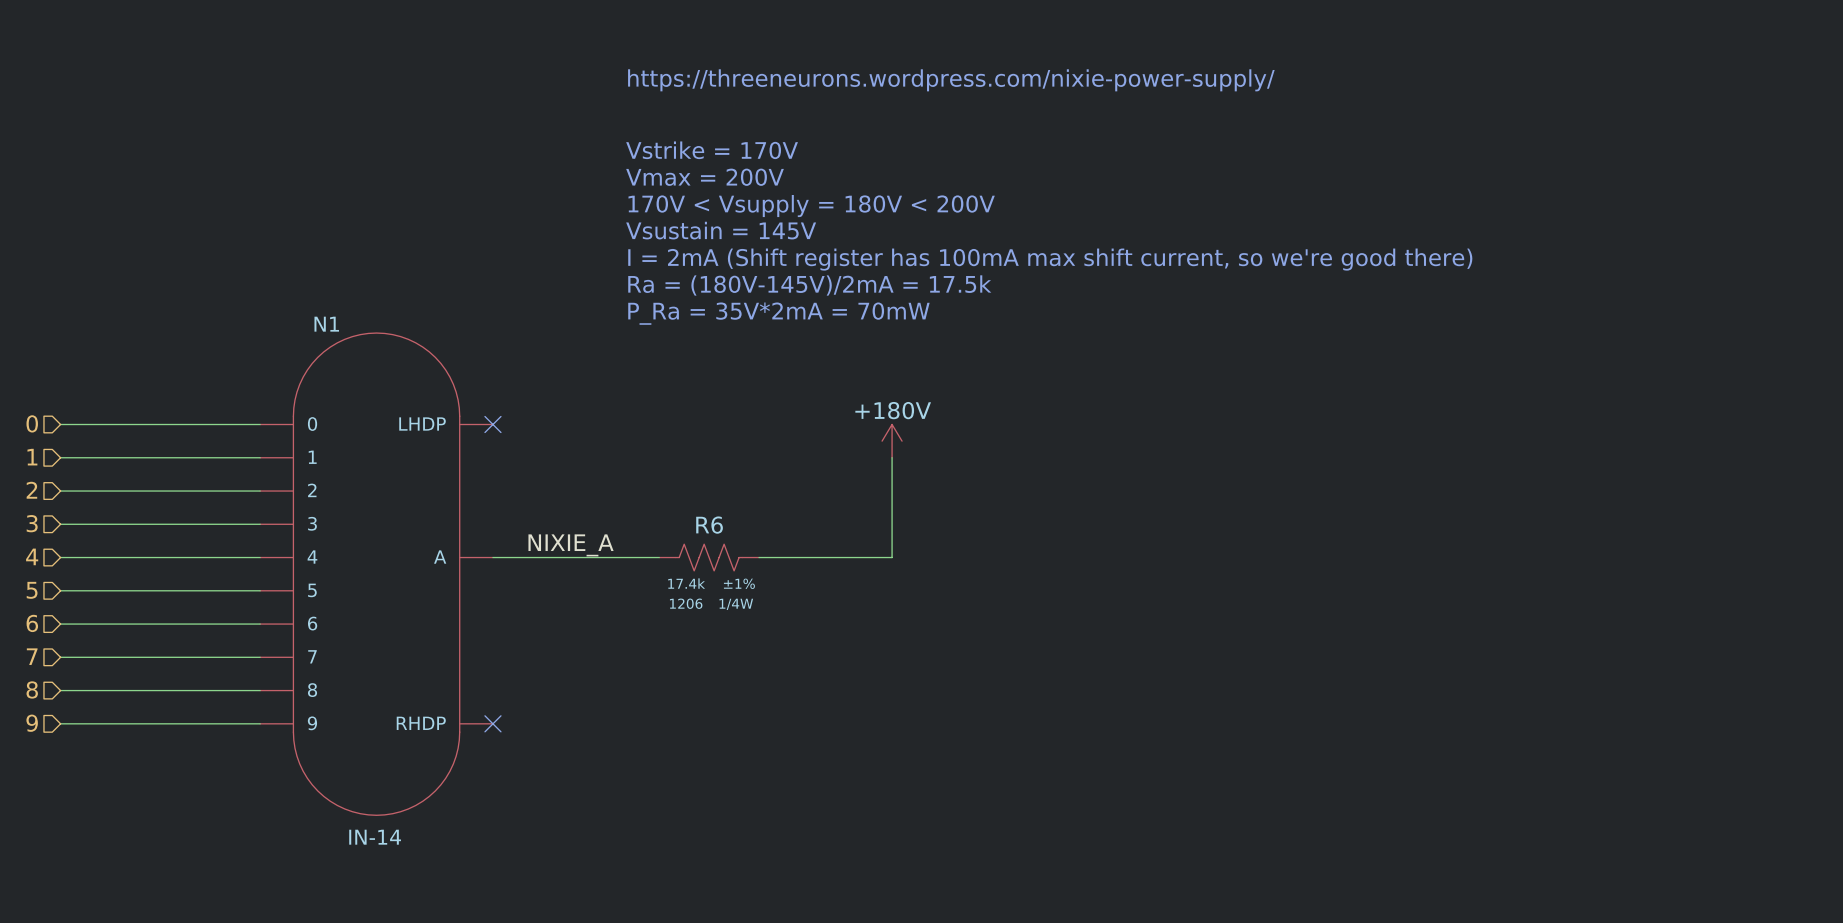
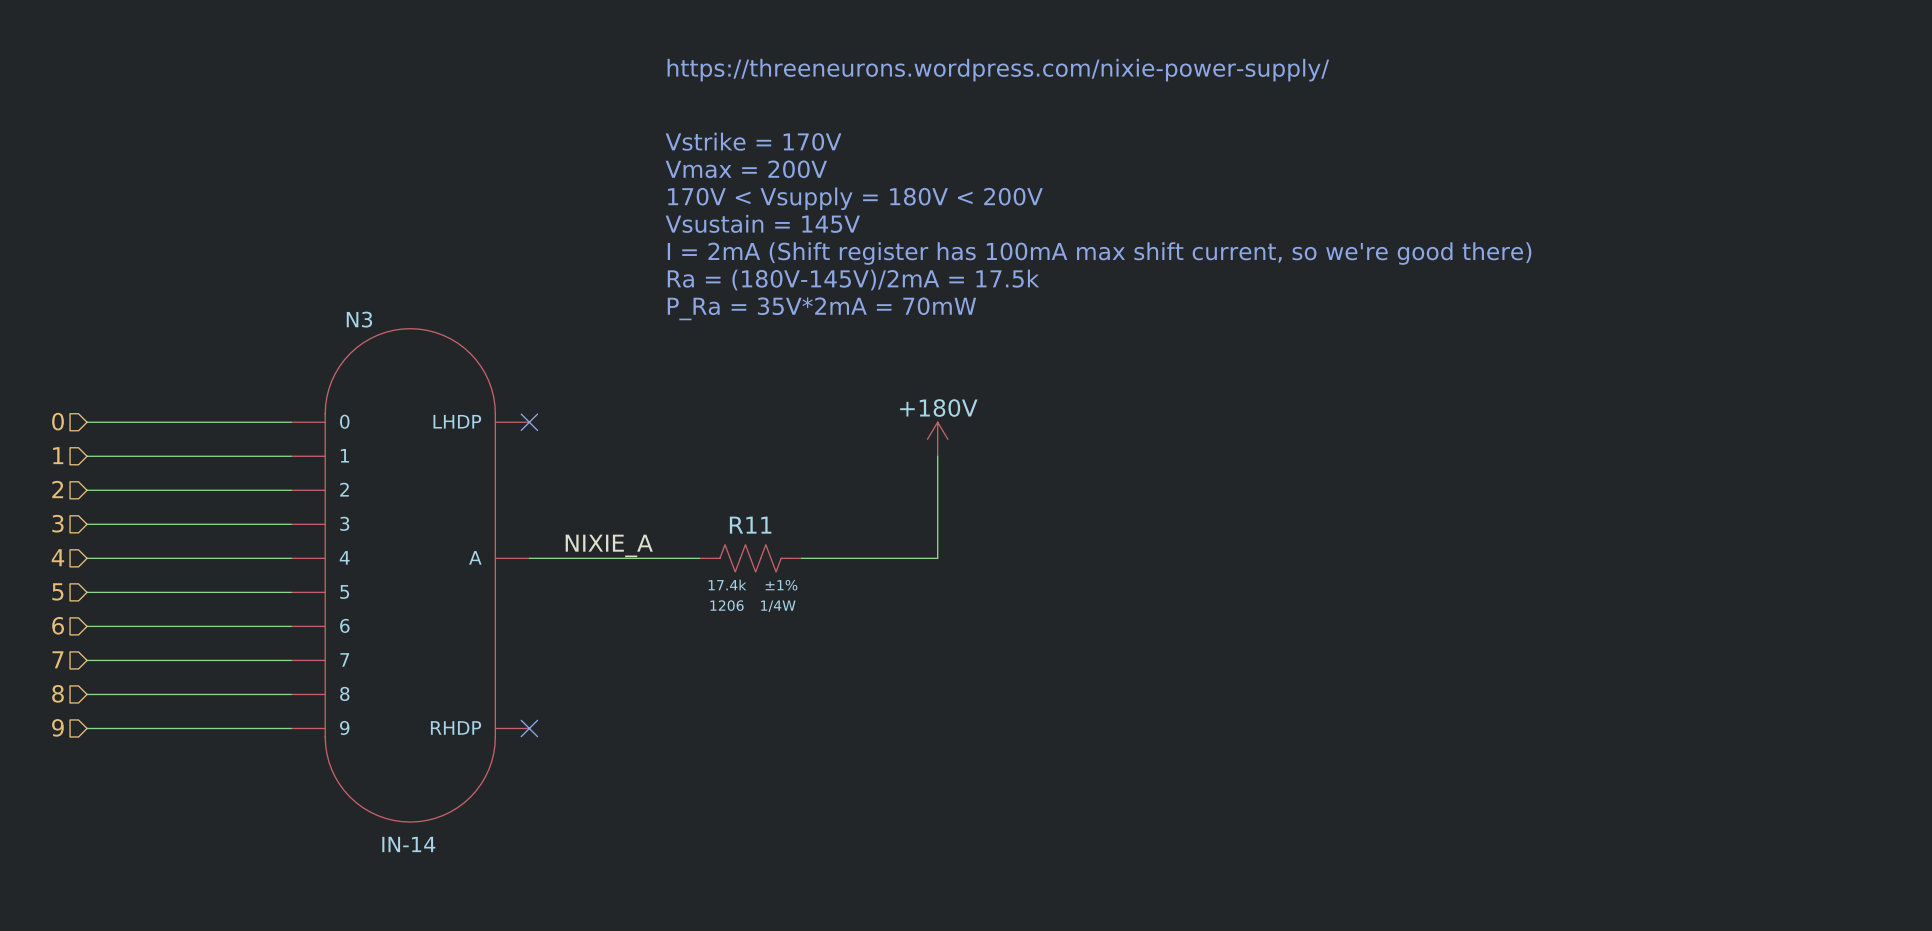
N1 name: N1 (326, 324) -> N3 (359, 319)
R6 name: R6 (709, 525) -> R11 (750, 525)

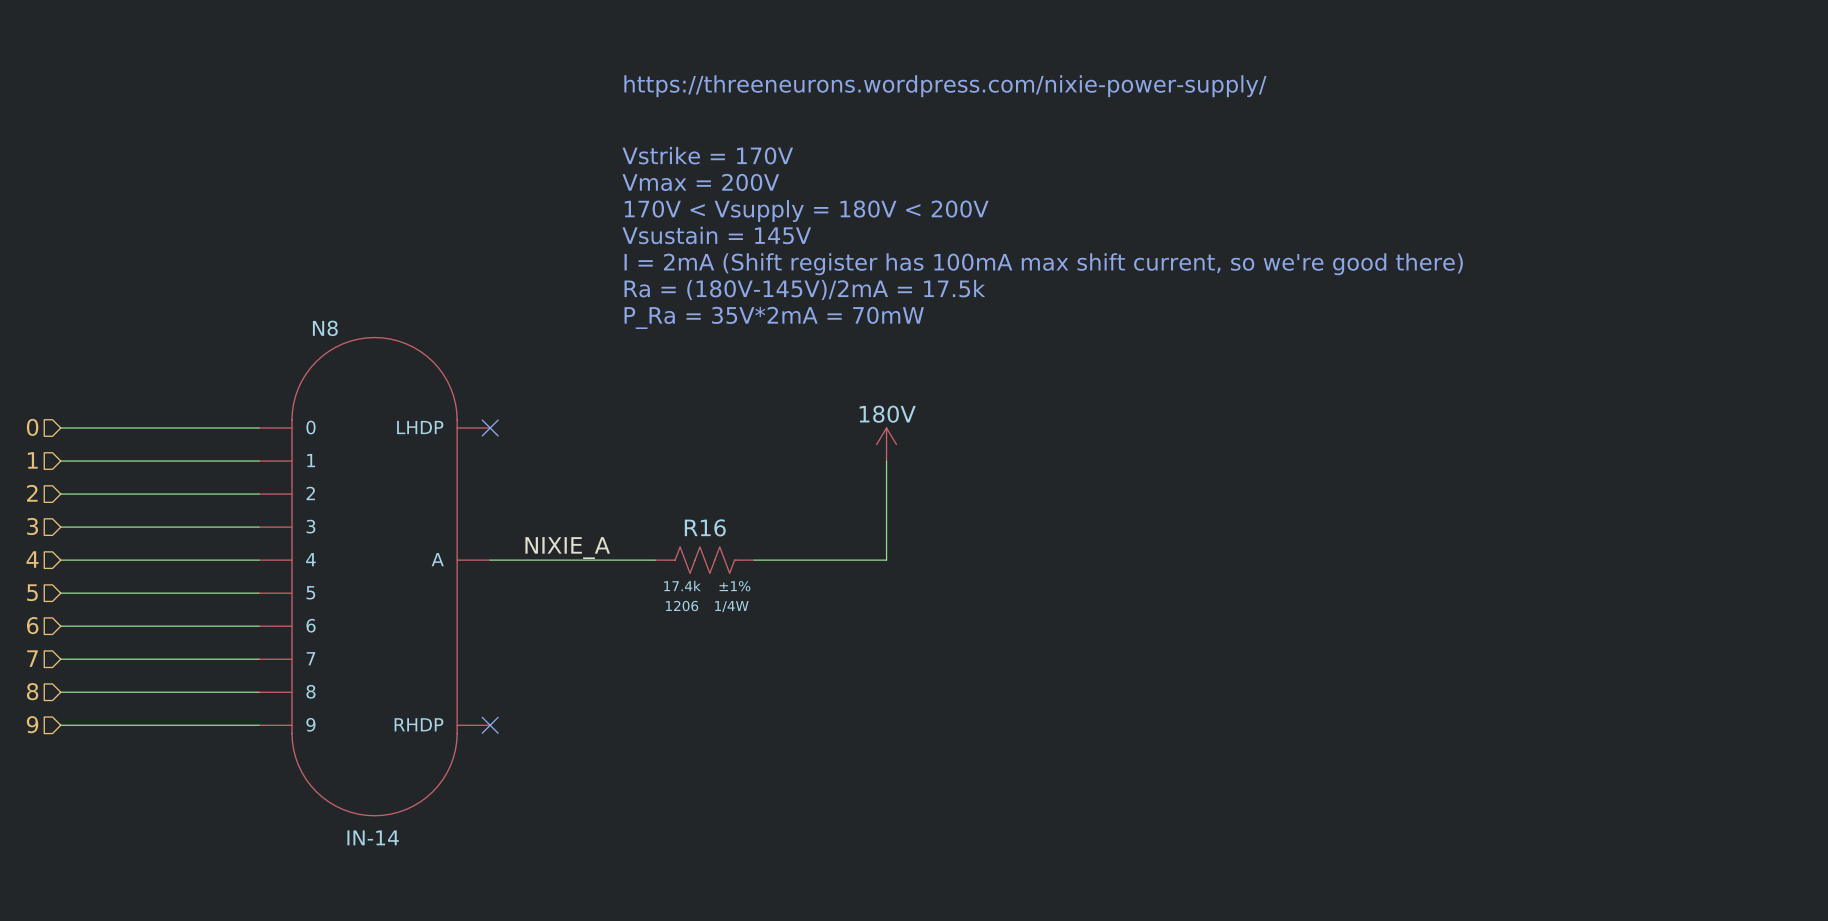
power symbol: +180V (937, 439) -> 180V (886, 444)
R11 name: R11 (750, 525) -> R16 (705, 527)
N3: IN-14 (410, 575) -> none
N8: none -> IN-14 (374, 576)

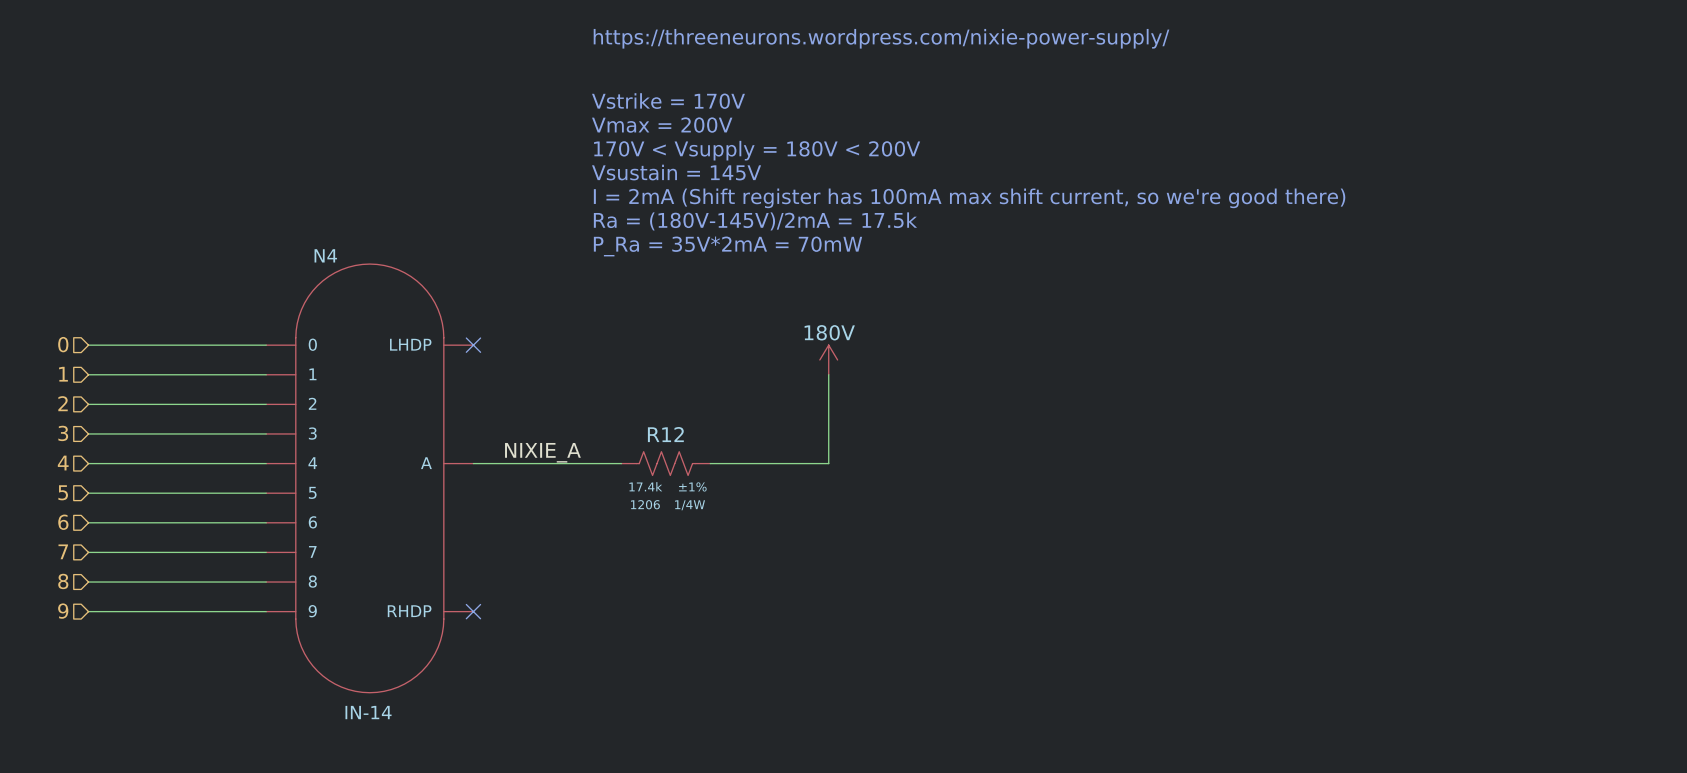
N8 name: N8 (325, 328) -> N4 (325, 255)
R16 name: R16 (705, 527) -> R12 (665, 434)

